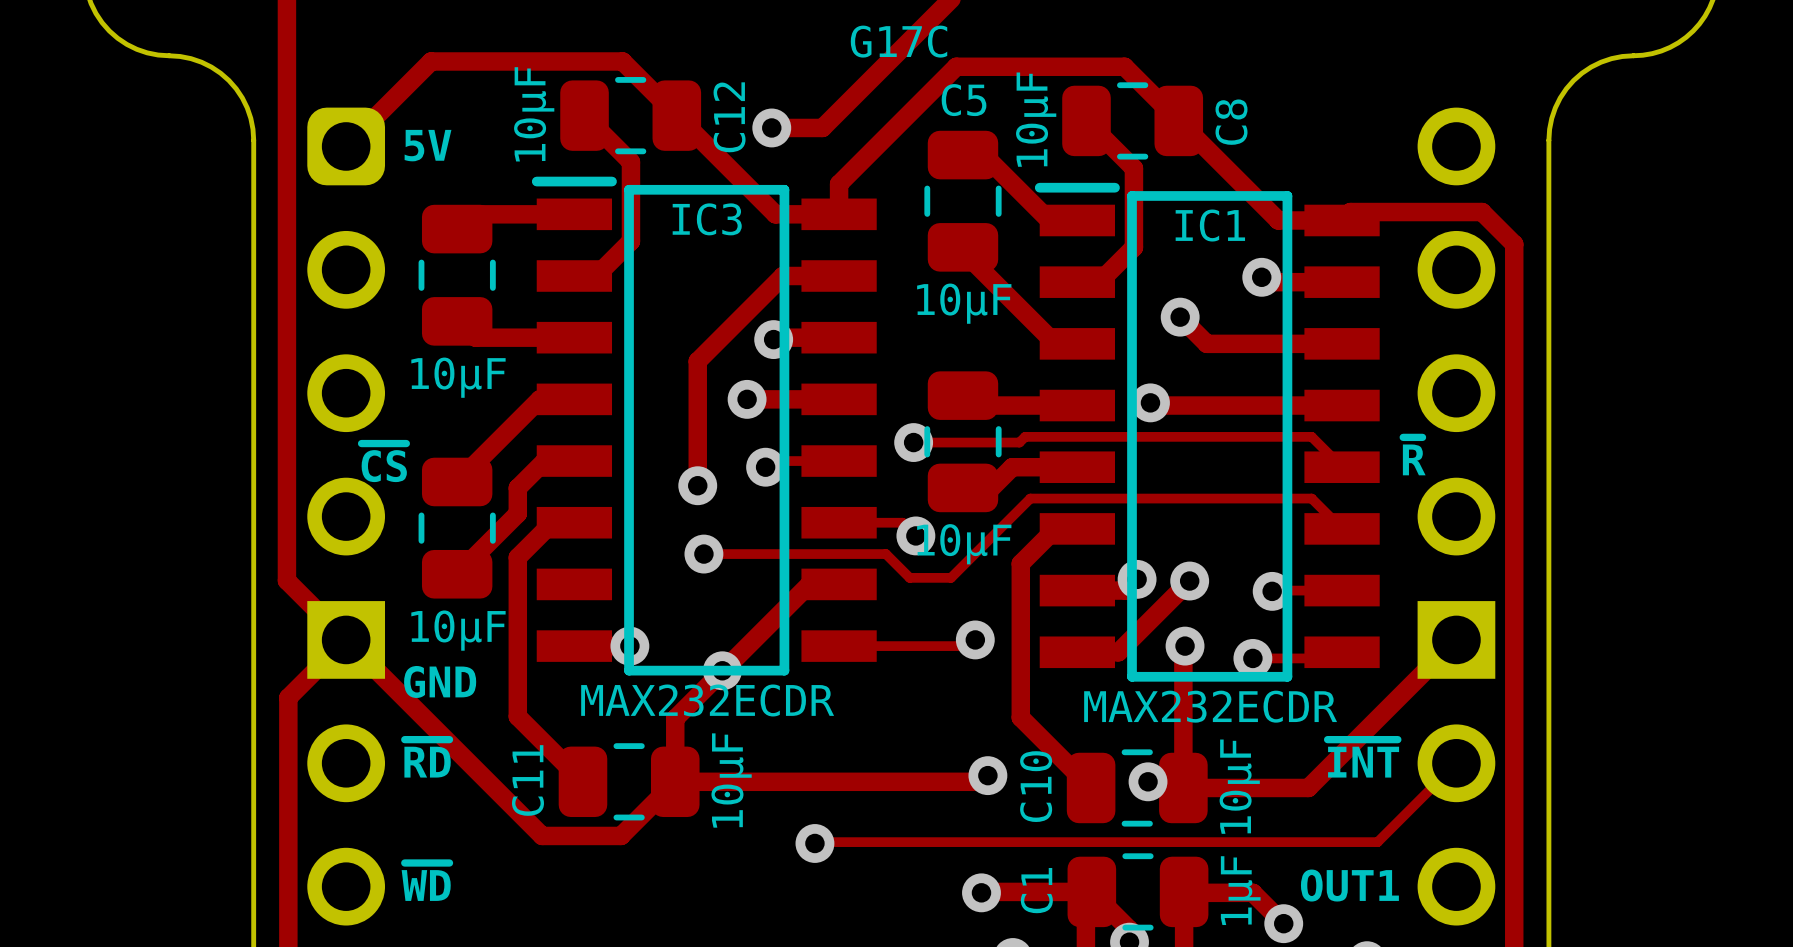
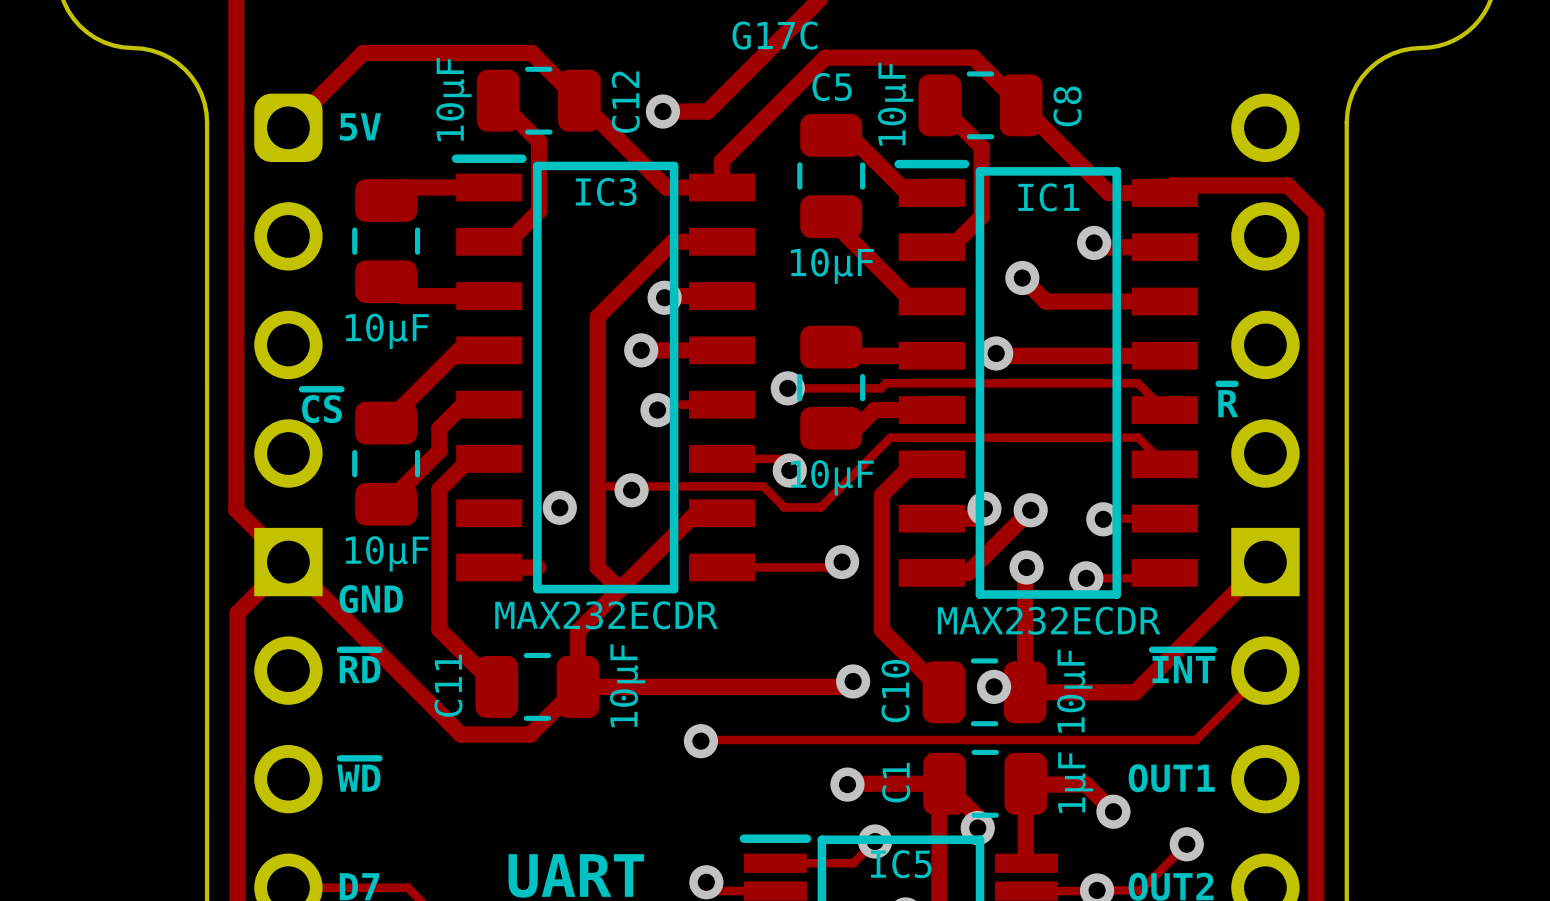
track: none -> (597, 426) (597, 567) (619, 589)
via: (697, 485) -> none
via position: (703, 554) -> (631, 490)
via: none -> (559, 507)
via: (629, 646) -> none
via: (722, 670) -> none

